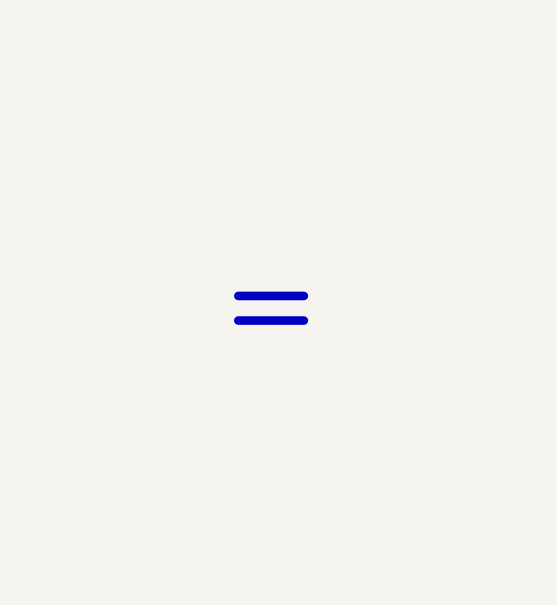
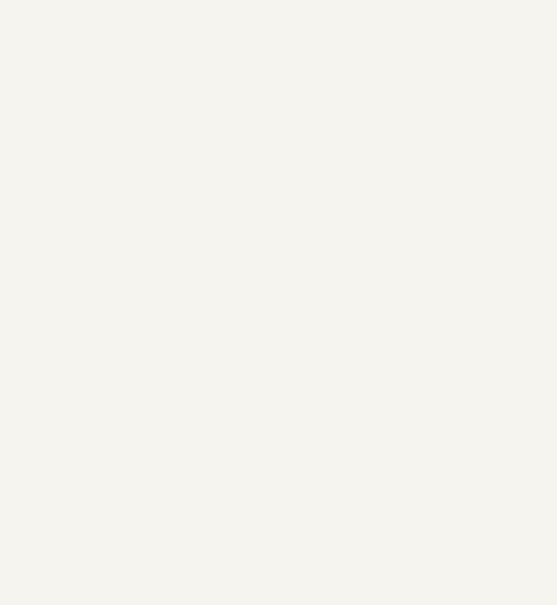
text: = (271, 308) -> none

